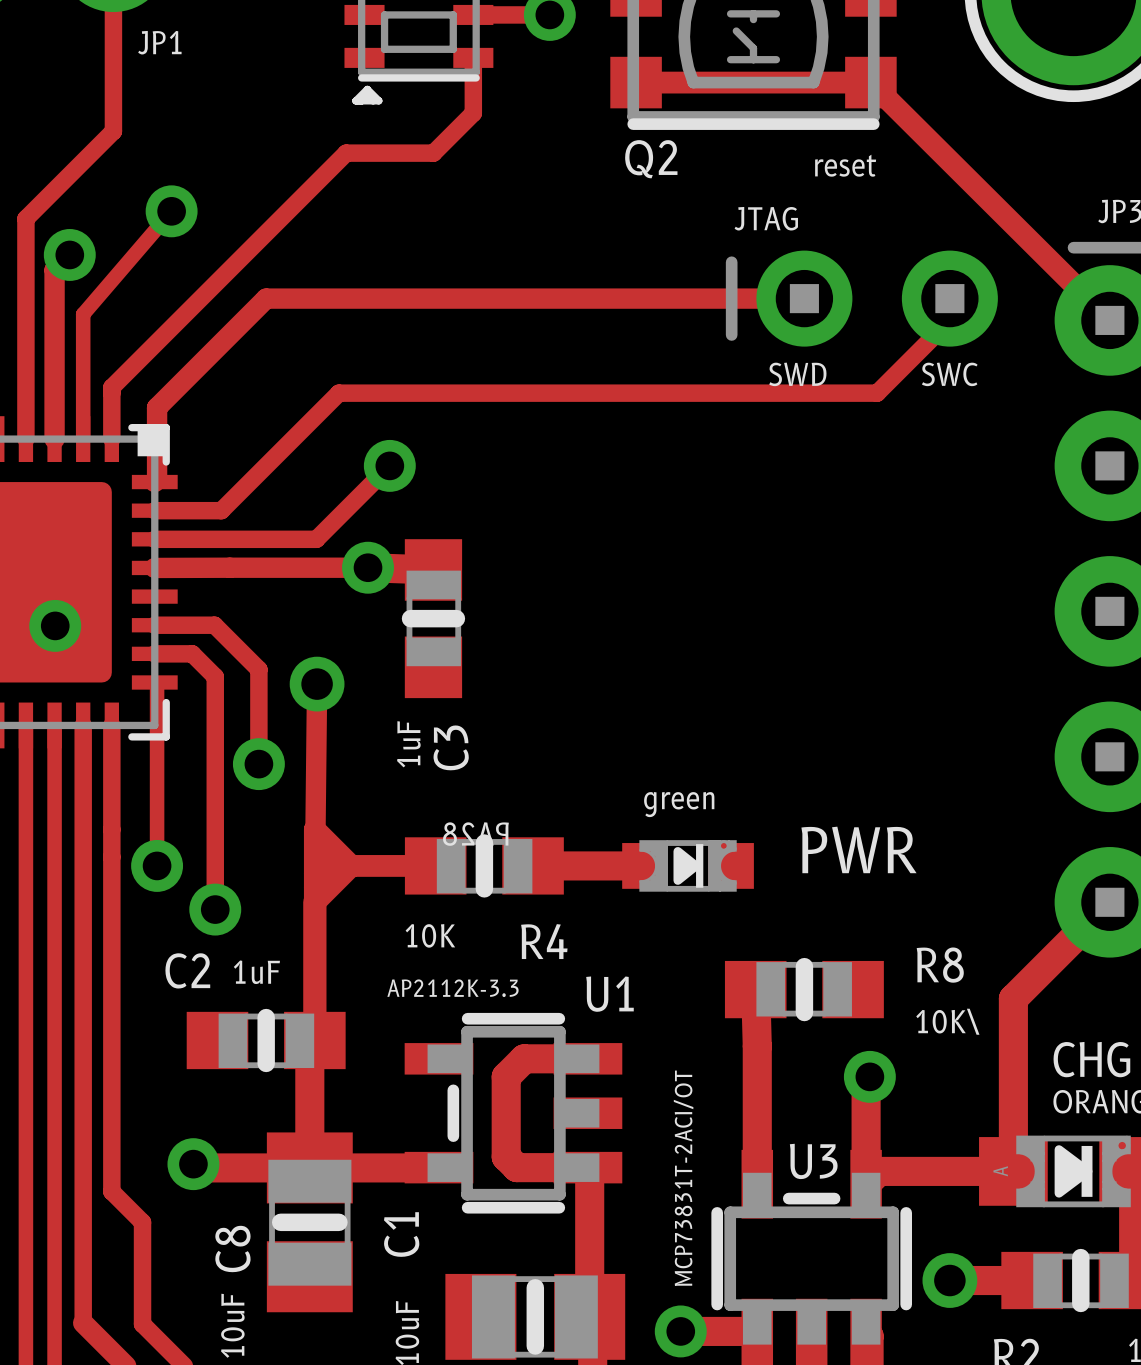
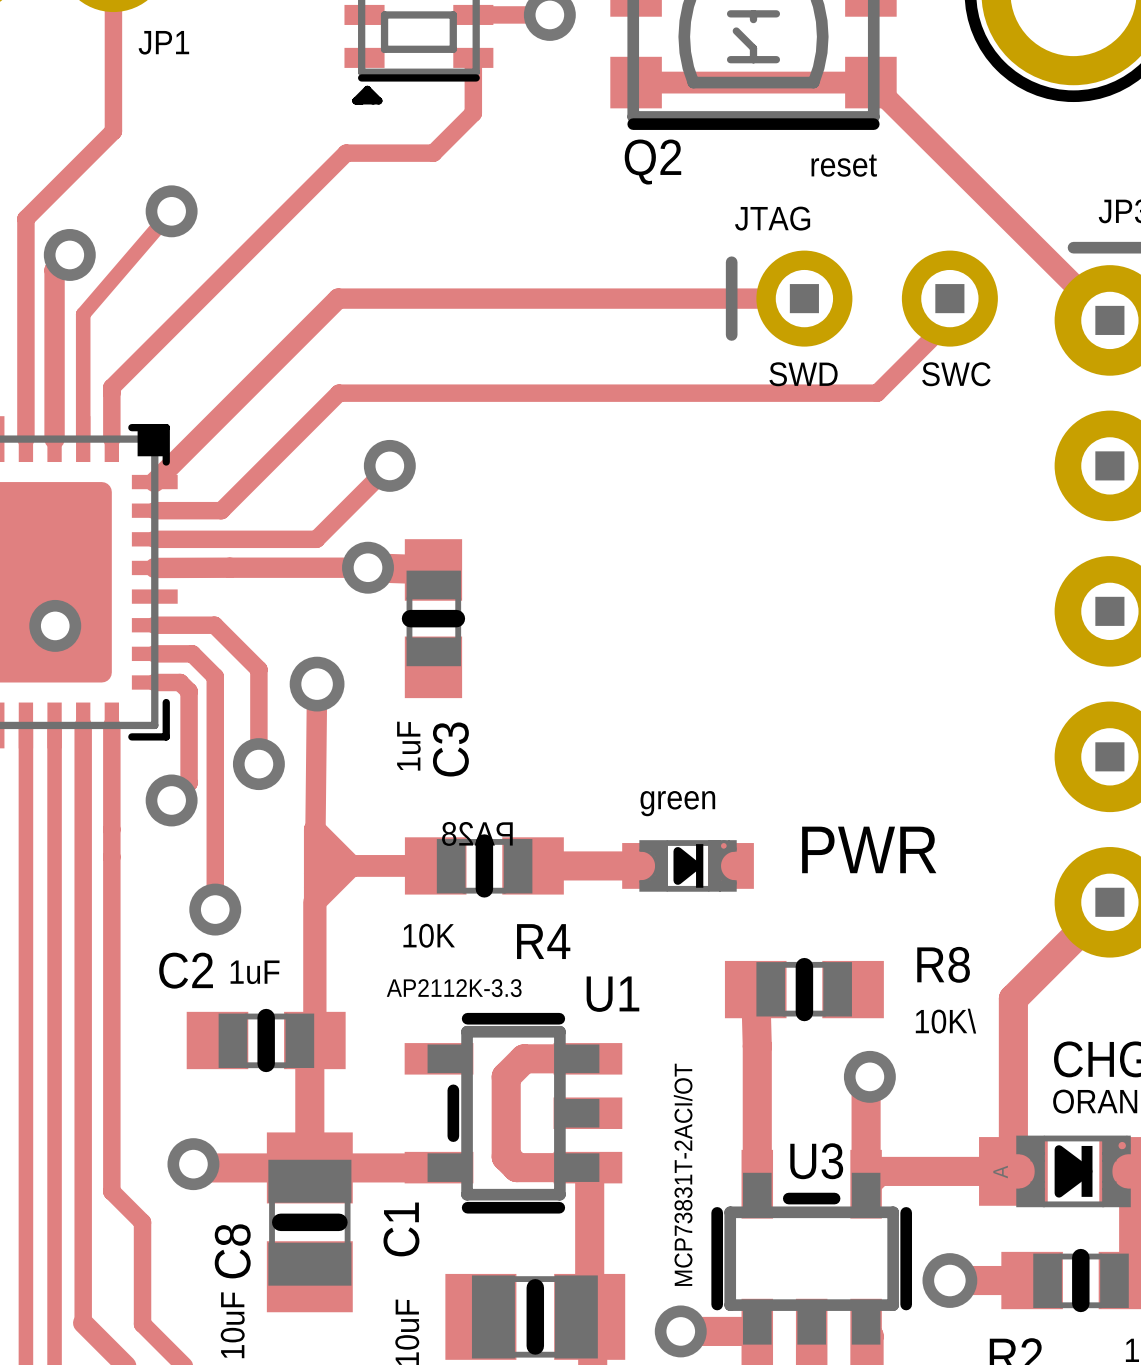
track: (338, 298) (266, 298) (157, 407) (157, 479) -> (338, 298) (157, 479)
track: (154, 682) (157, 684) (157, 865) -> (154, 682) (180, 682) (189, 691) (189, 783) (171, 800)
via position: (157, 865) -> (171, 800)

